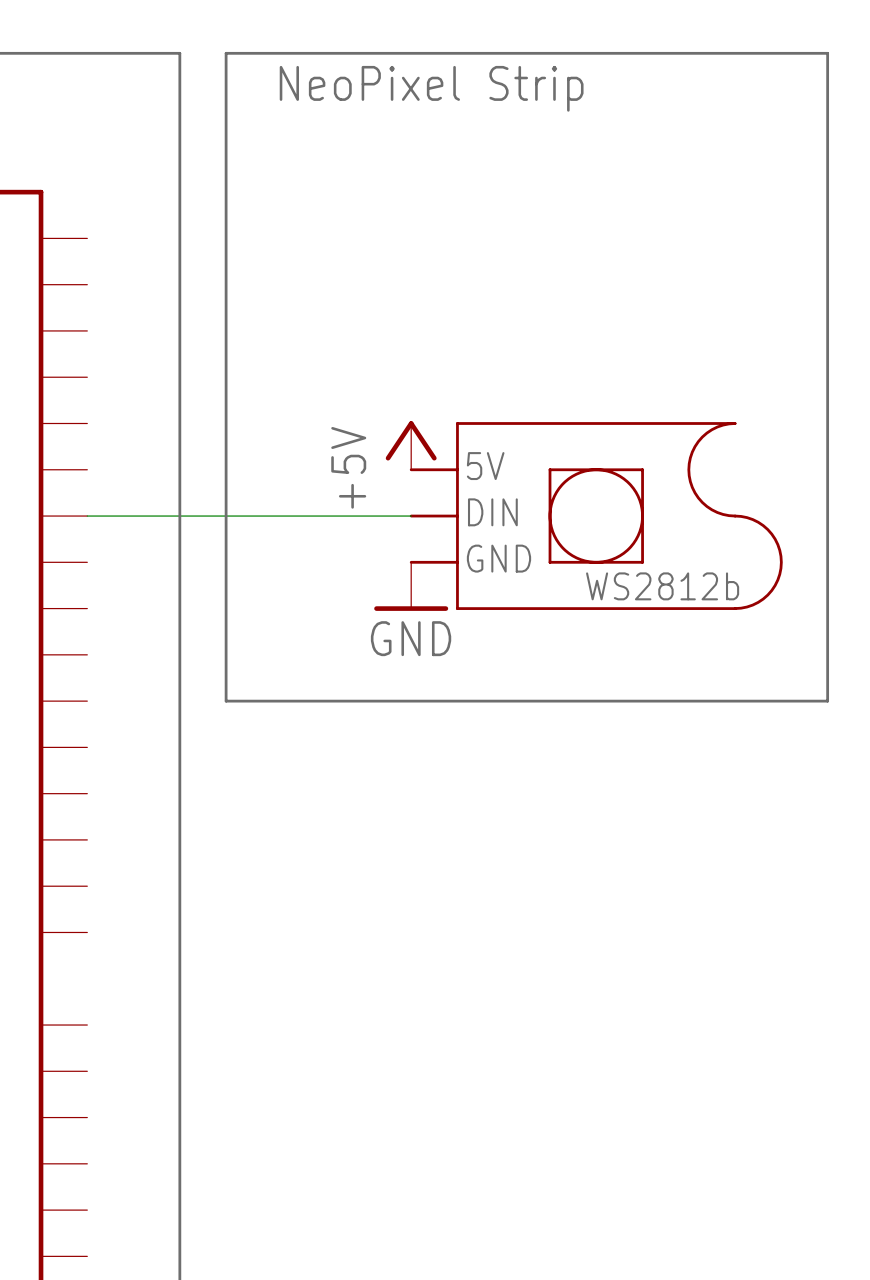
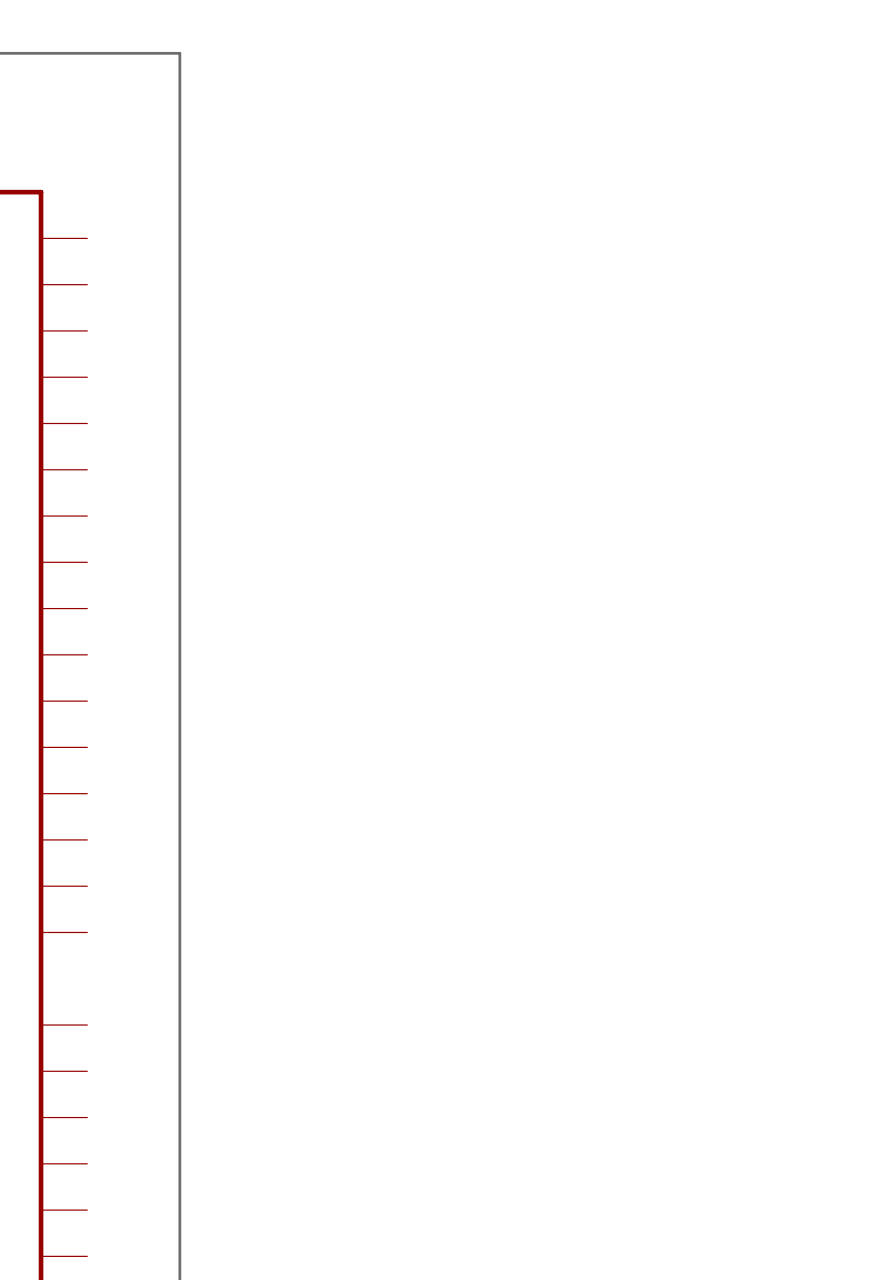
line: (226, 53) (827, 53) (827, 701) (226, 701) (226, 53) -> none
text: NeoPixel Strip (431, 88) -> none
line: (457, 423) (457, 608) (741, 608) (752, 605) (763, 599) (775, 585) (779, 574) (780, 556) (777, 544) (771, 534) (763, 525) (752, 519) (723, 514) (711, 509) (698, 497) (690, 481) (688, 469) (690, 457) (698, 441) (706, 433) (717, 427) (735, 423) (457, 423) -> none
power symbol: +5V (411, 445) -> none
text: 5V (485, 466) -> none
drawing: [548, 468, 644, 564] -> none
line: (411, 469) (457, 469) -> none
line: (550, 469) (642, 469) (642, 562) (550, 562) (550, 469) -> none
text: DIN (492, 512) -> none
wire: (87, 516) (411, 516) -> none
line: (411, 516) (457, 516) -> none
text: GND (498, 558) -> none
line: (411, 562) (457, 562) -> none
power symbol: GND (411, 586) -> none
text: WS2812b (662, 586) -> none

